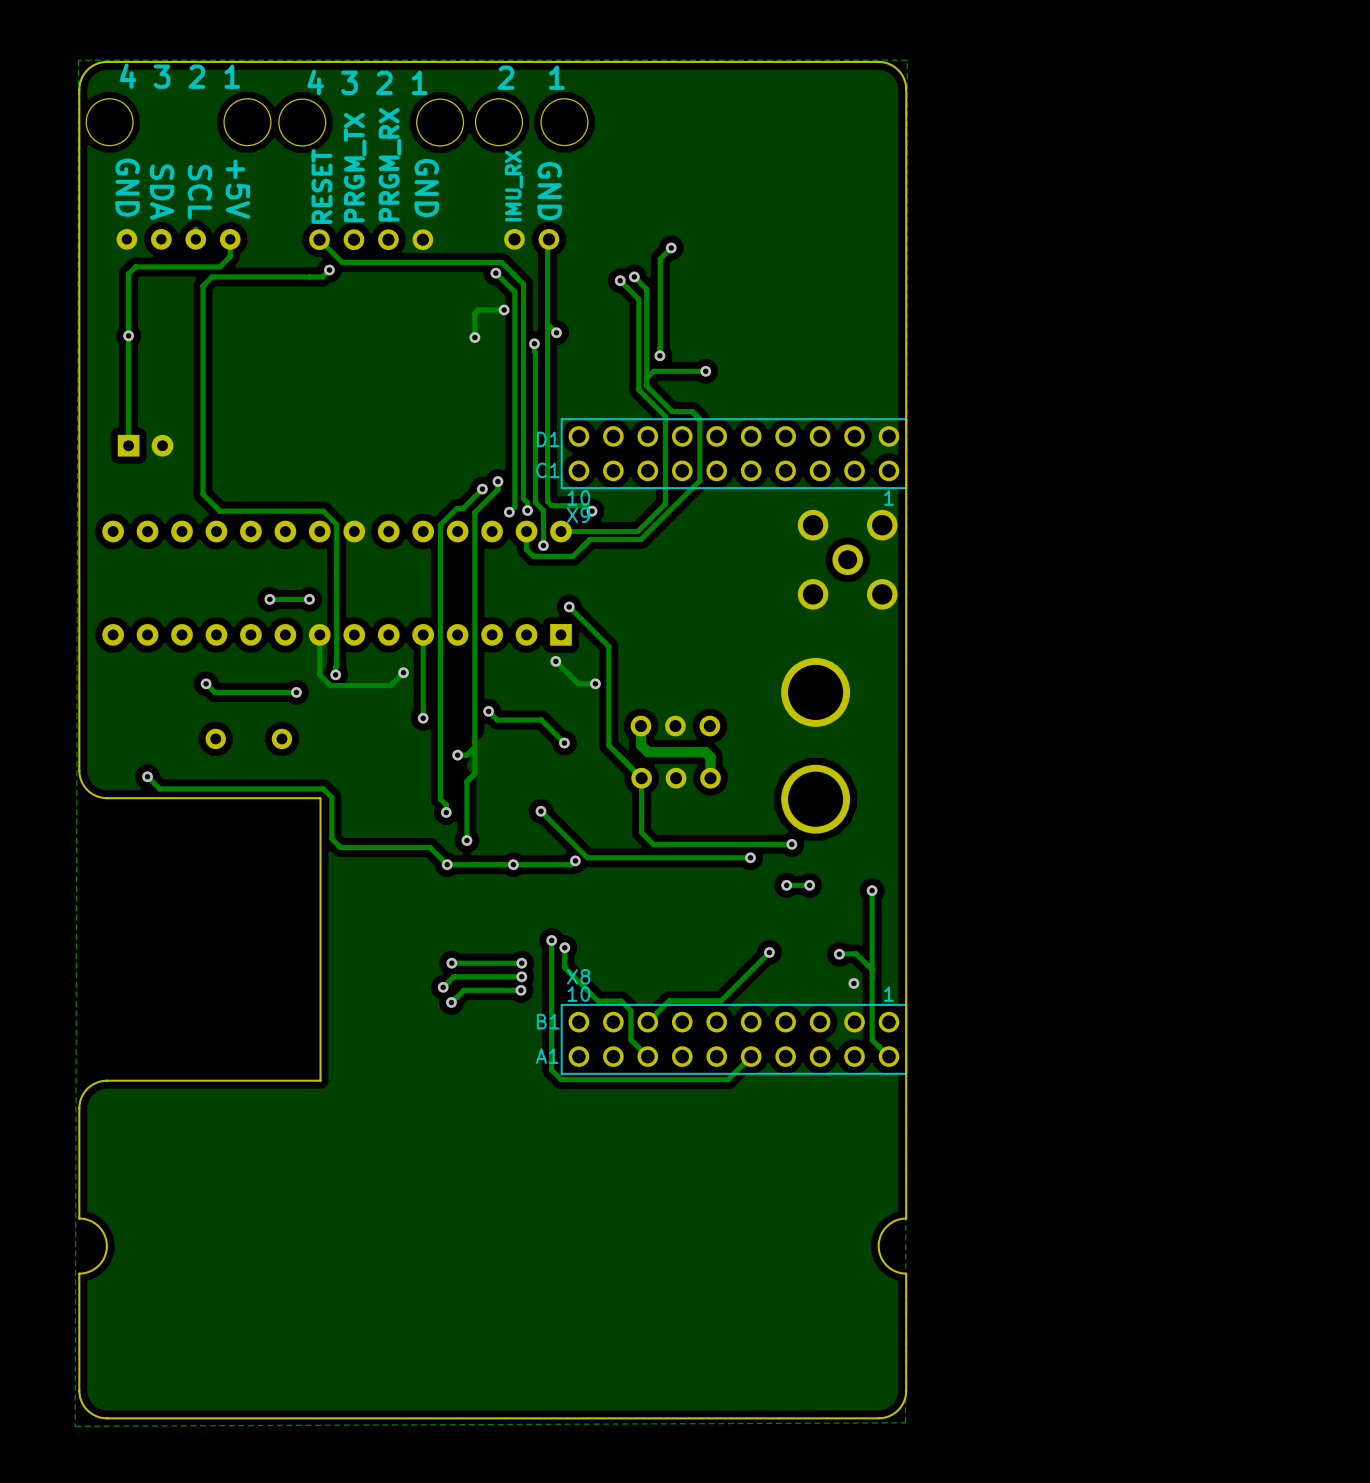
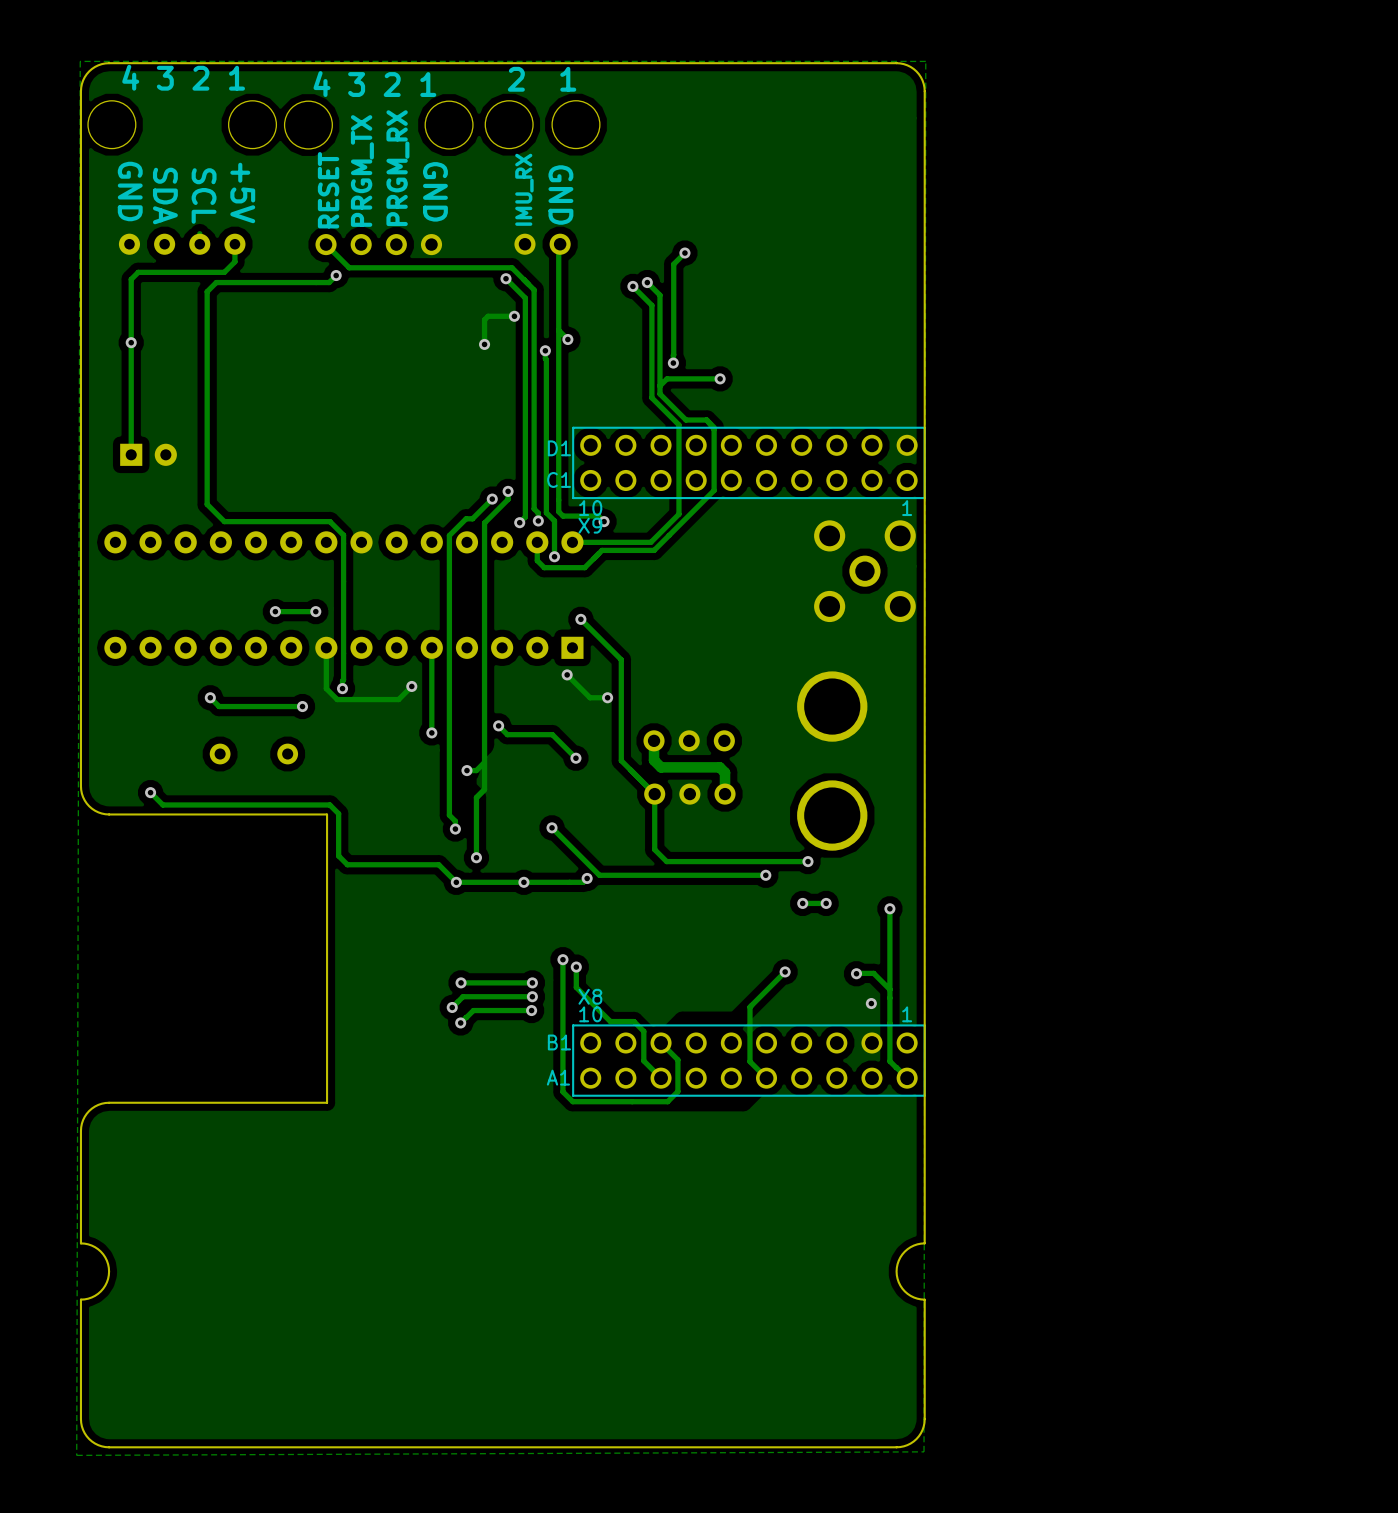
track: (734, 986) (721, 1000) (669, 1000) (647, 1022) -> (749, 1007) (749, 1061) (766, 1078)
track: (751, 1056) (728, 1079) (654, 1079) -> (661, 1042) (677, 1059) (677, 1091) (667, 1101)

